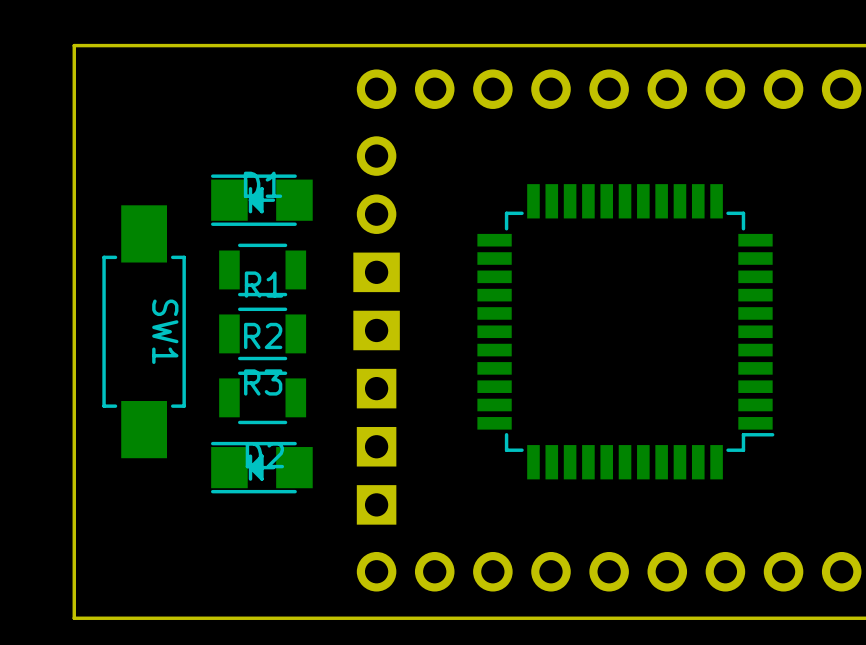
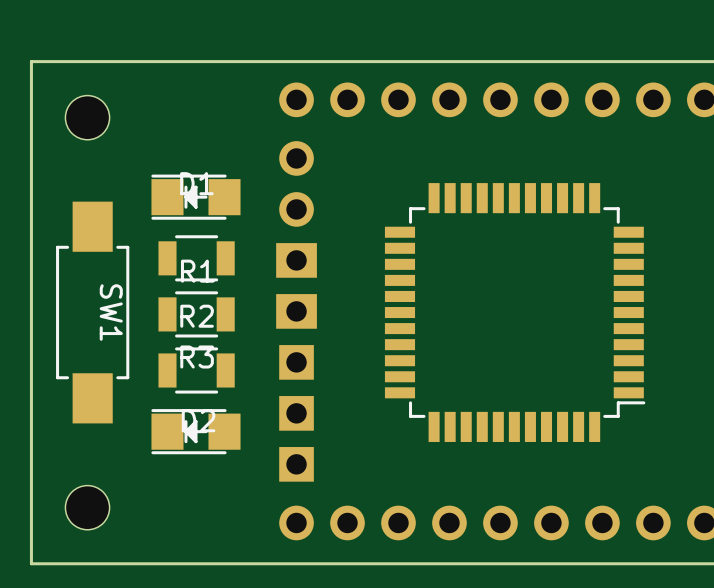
part: none -> (87, 117)
part: none -> (87, 507)

